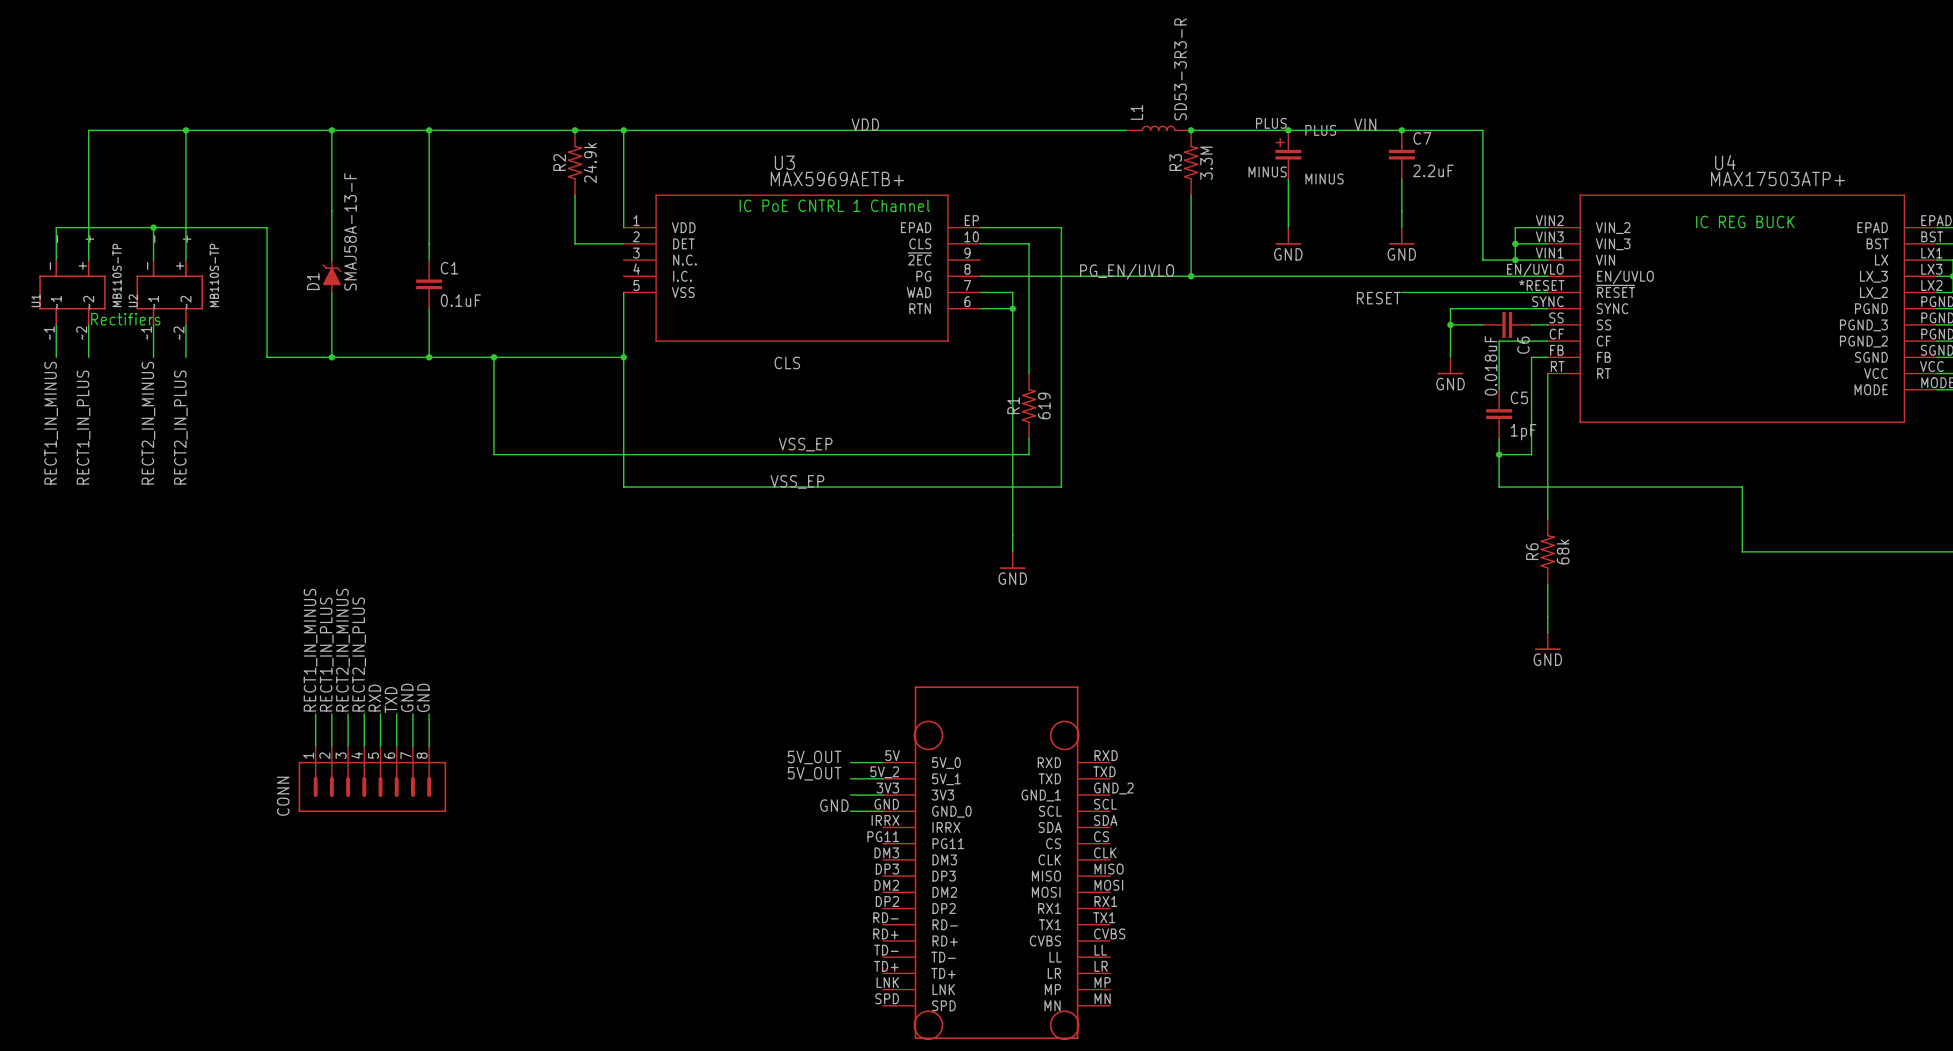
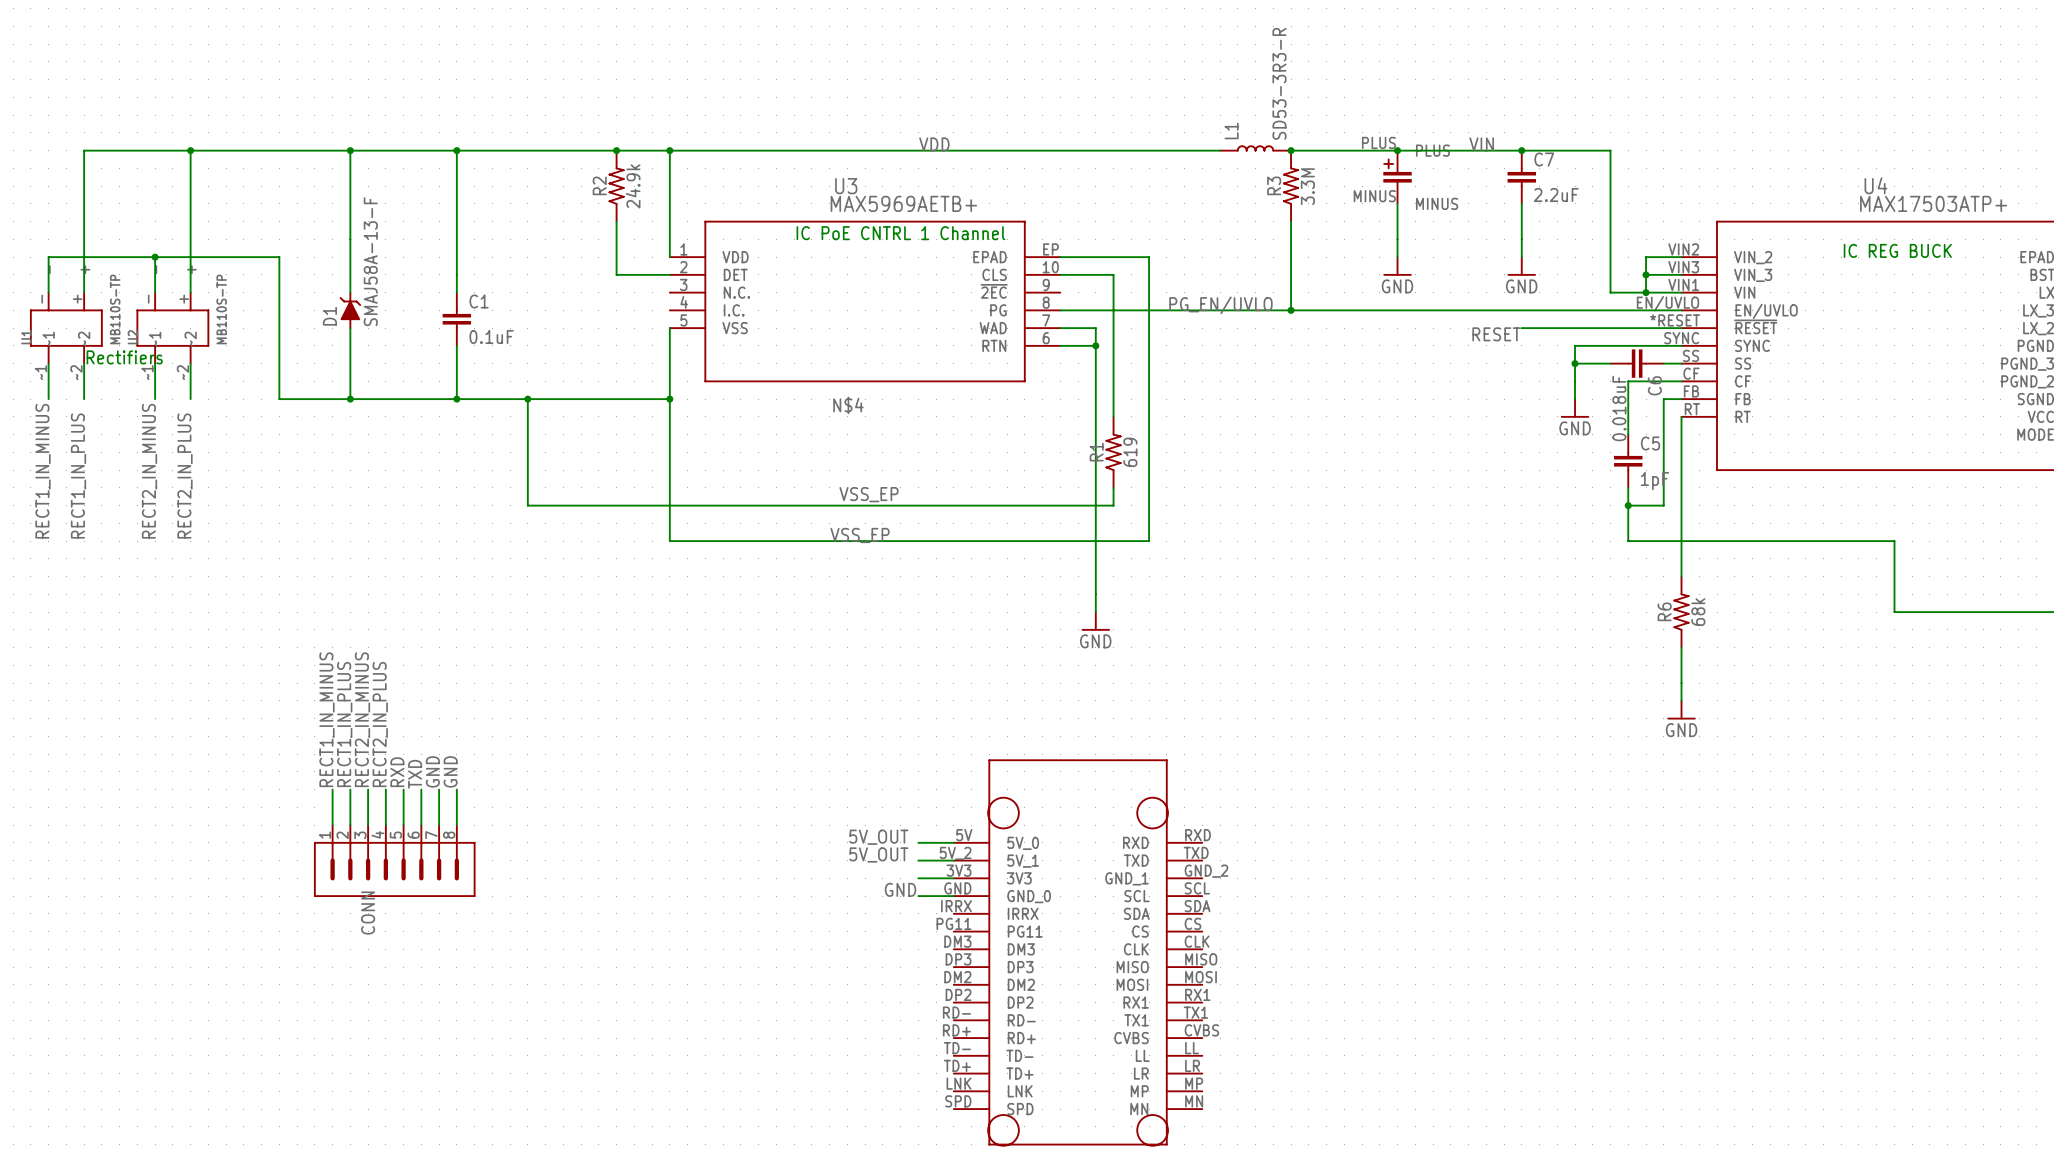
label: CLS (787, 363) -> N$4 (848, 405)
CONN name position: CONN (283, 796) -> CONN (368, 913)

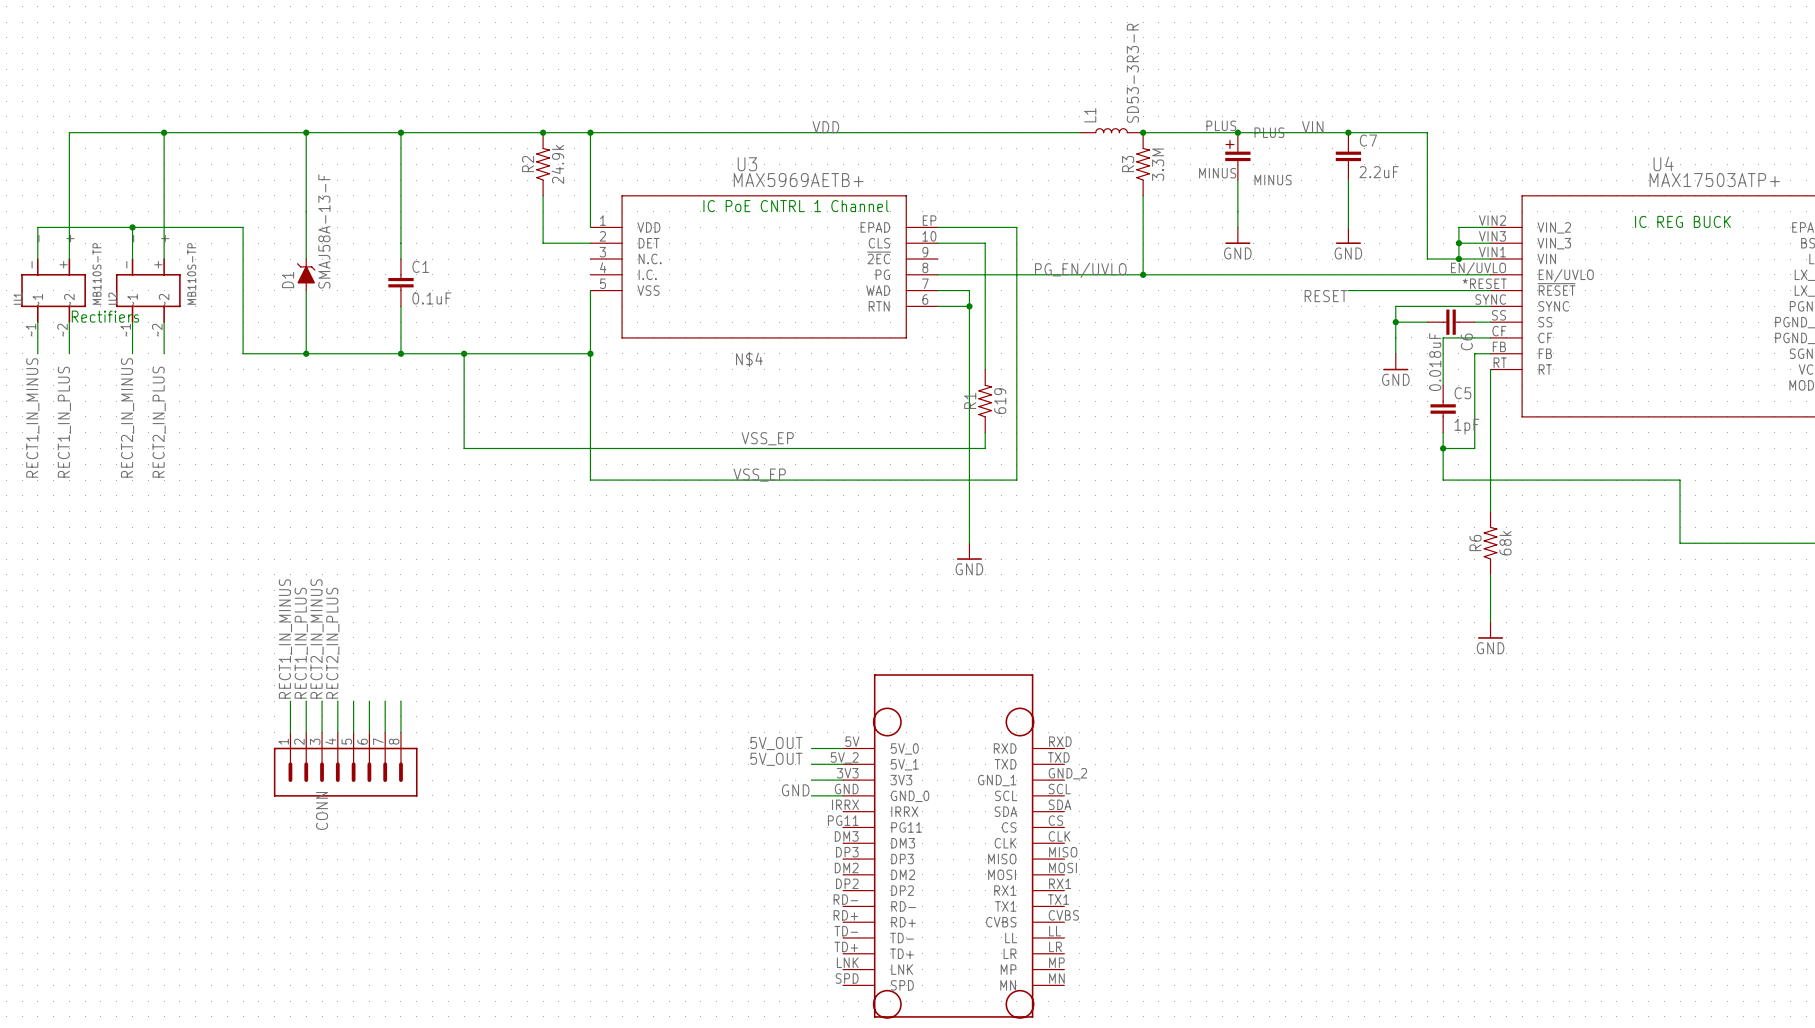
label: GND (432, 771) -> none
label: GND (450, 771) -> none
label: RXD (397, 772) -> none
label: TXD (415, 774) -> none

